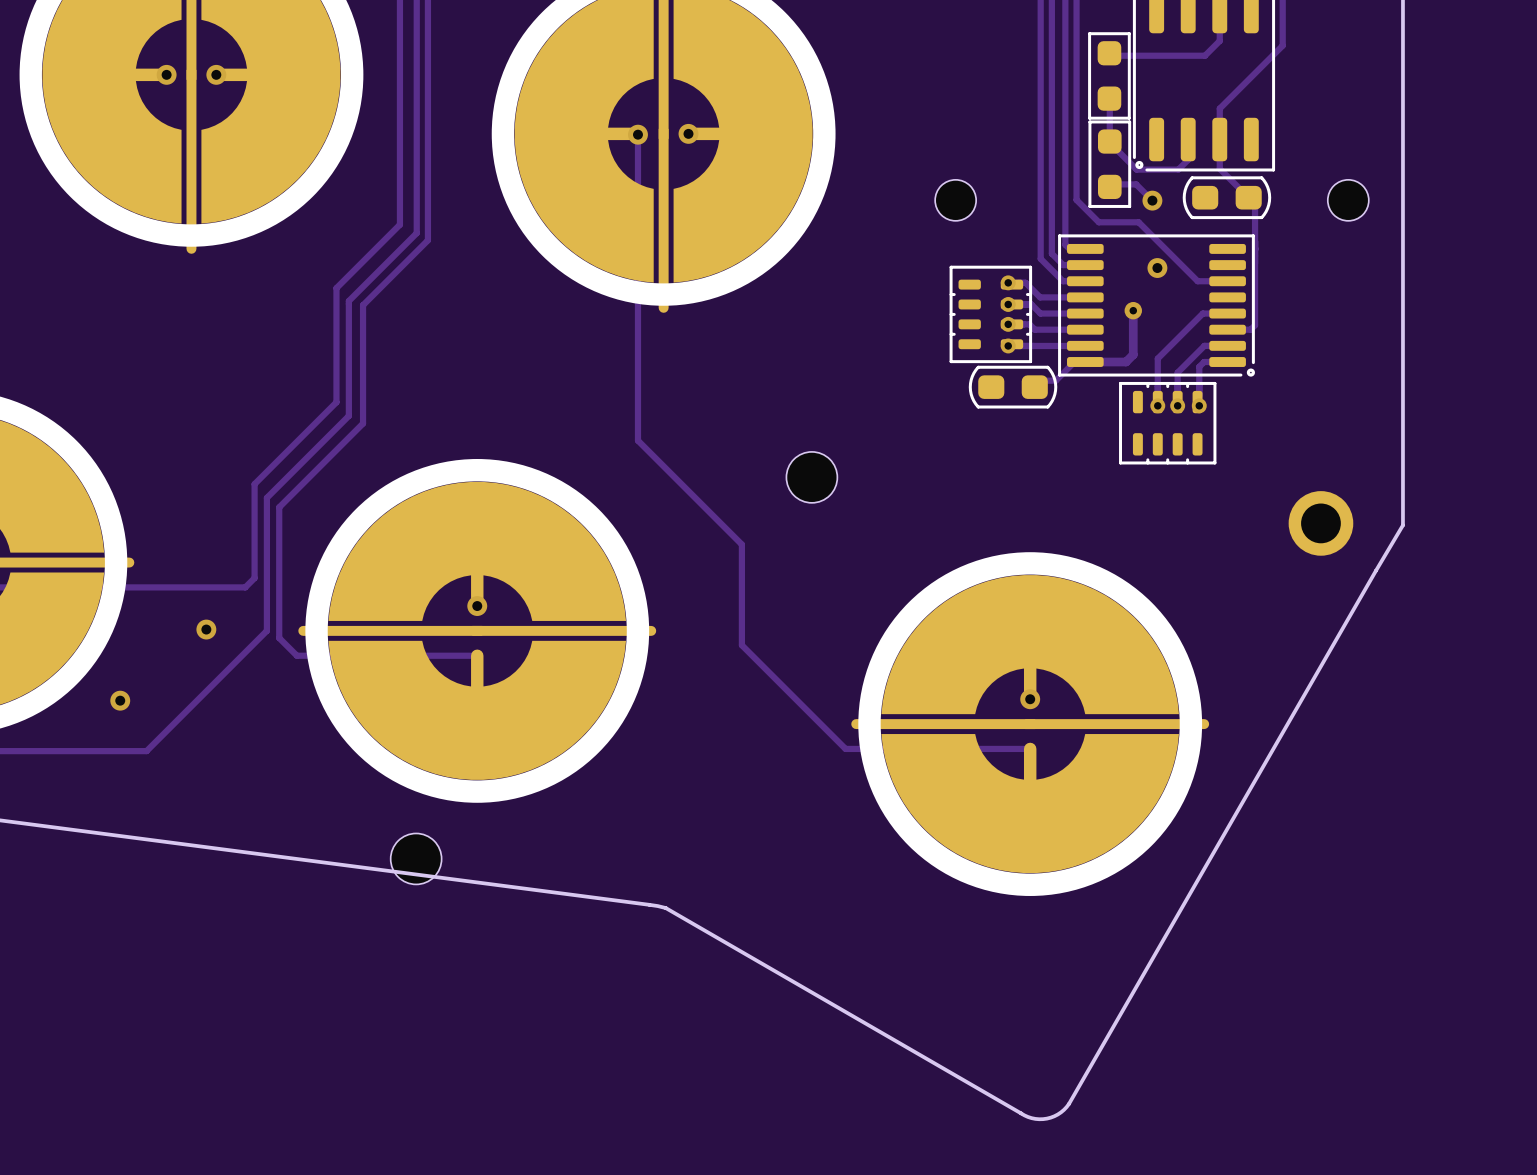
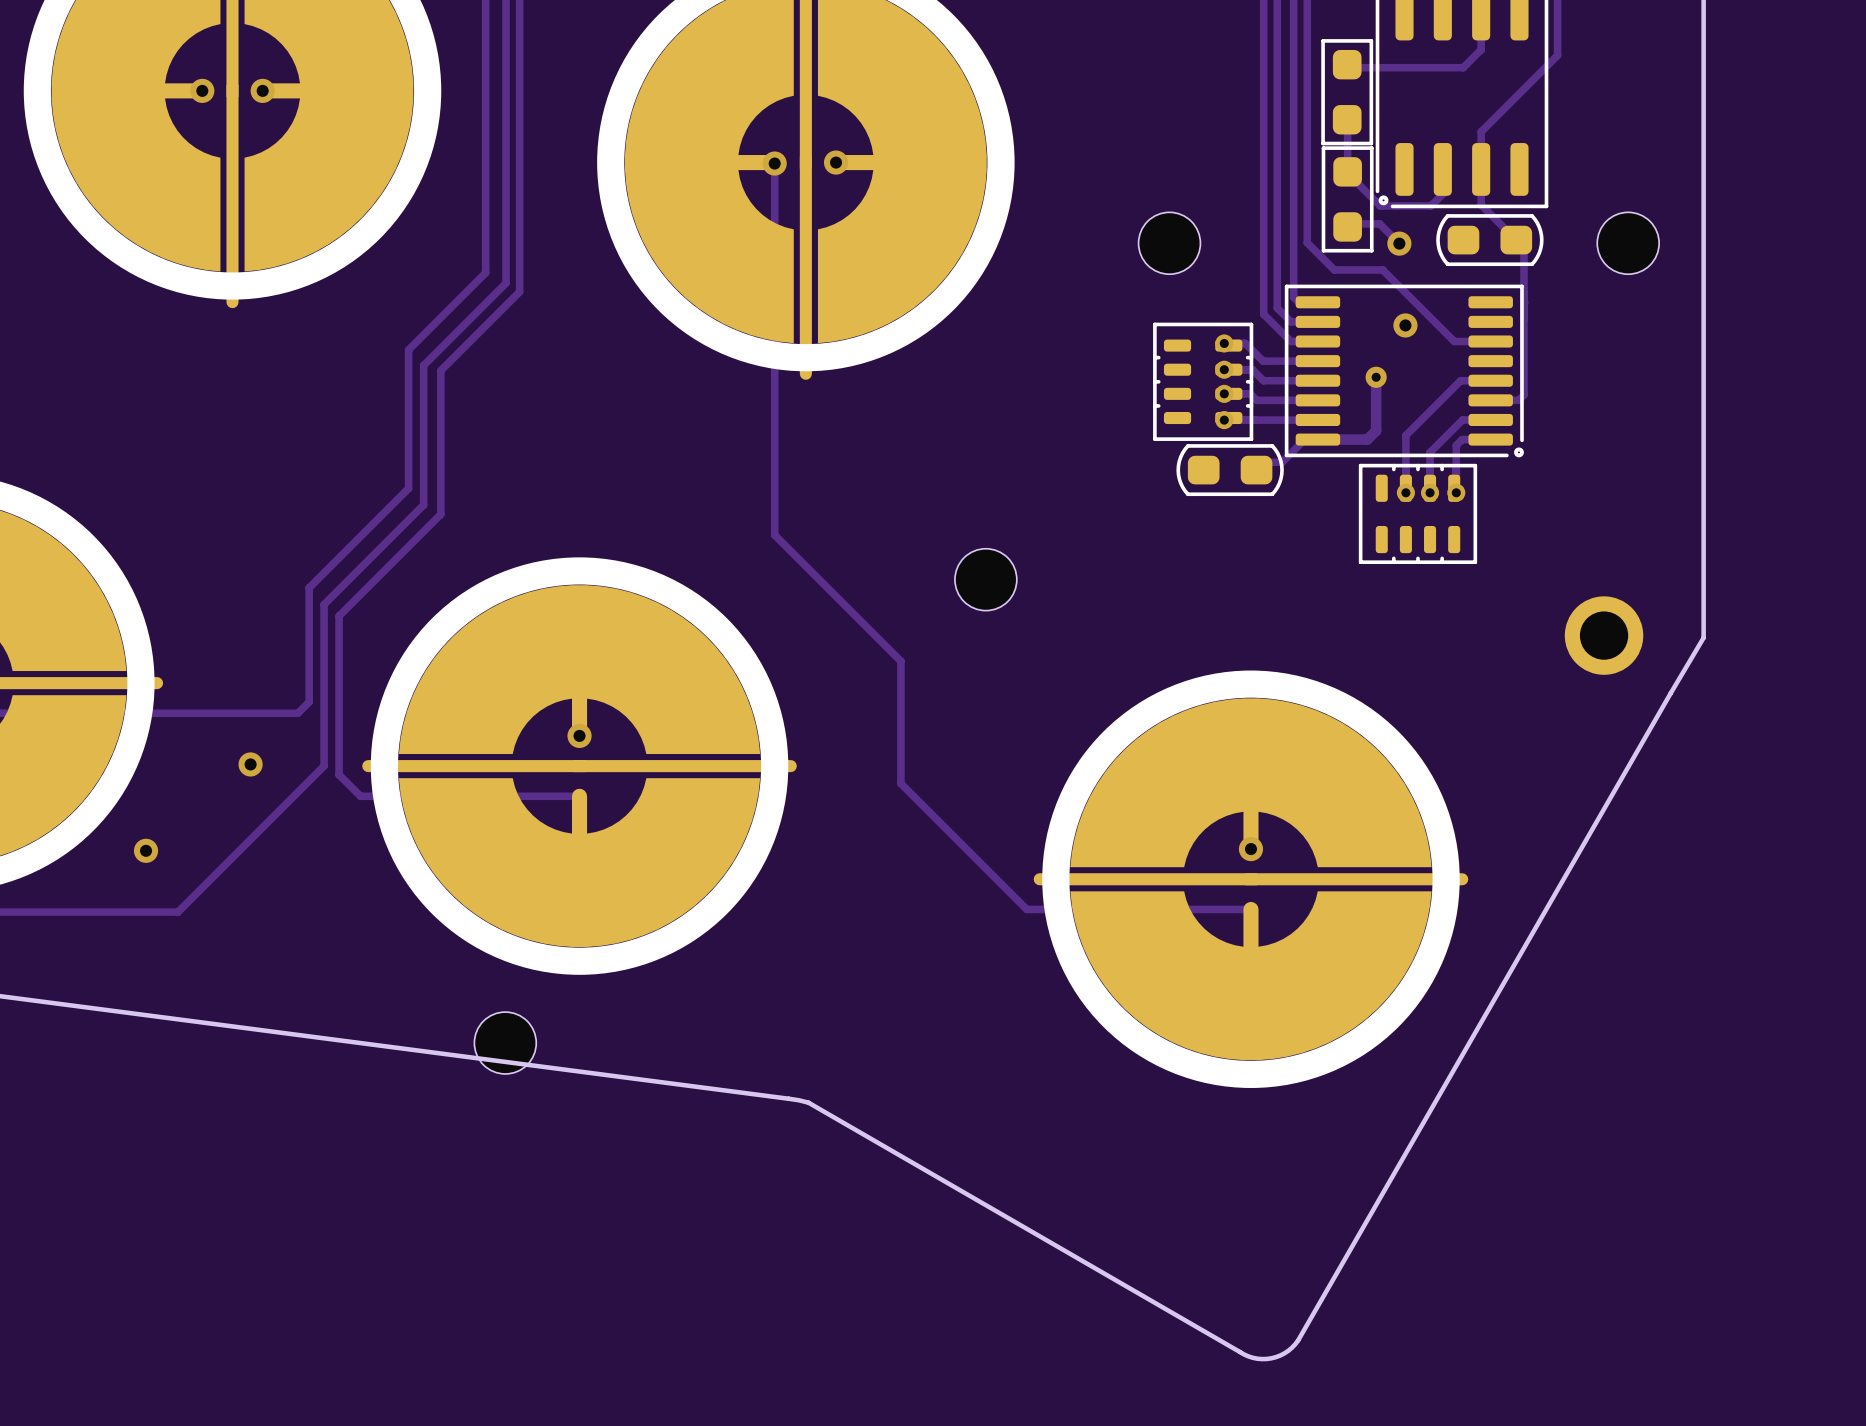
part footprint: [935, 179, 977, 221] -> [1138, 212, 1201, 275]
part footprint: [1327, 179, 1369, 221] -> [1597, 212, 1660, 275]

